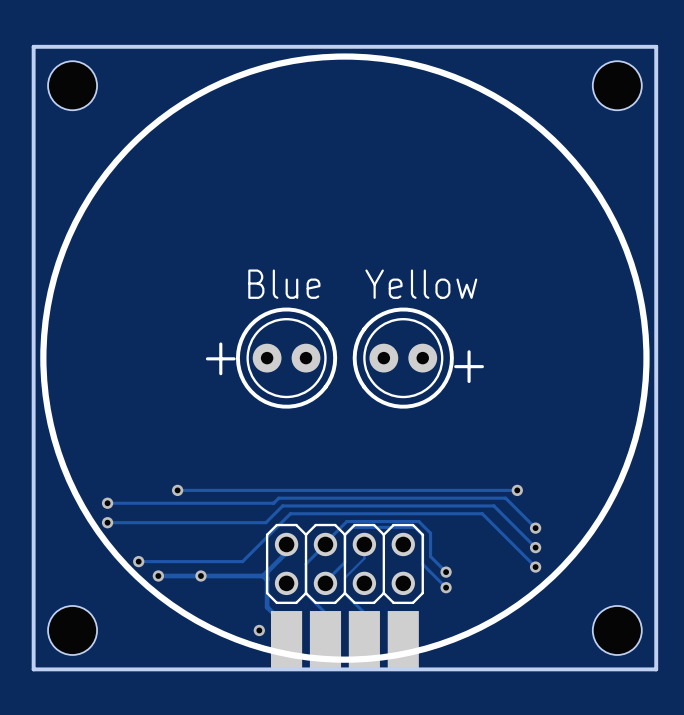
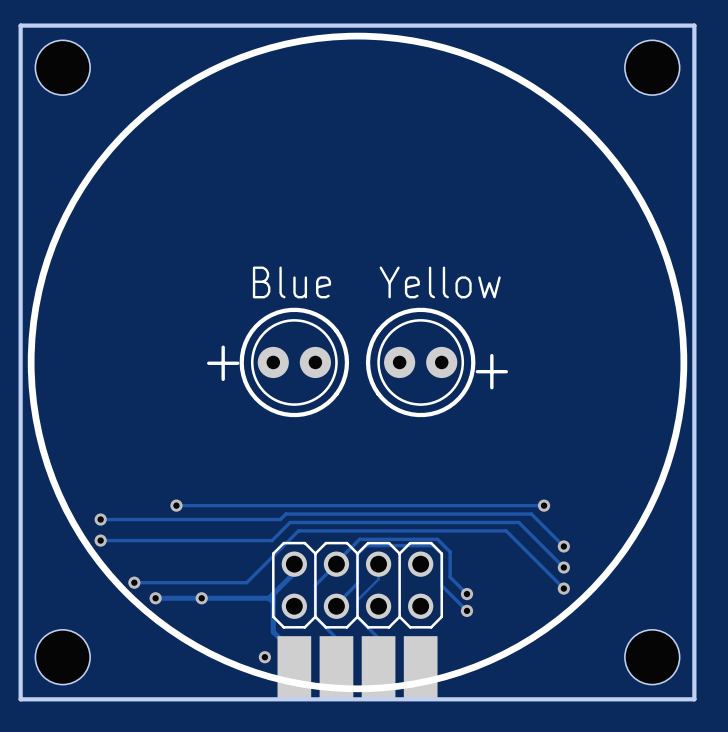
hole: (72, 85) -> none
part: none -> (62, 67)
hole: (617, 85) -> none
part: none -> (652, 67)
hole: (72, 630) -> none
part: none -> (62, 657)
hole: (617, 630) -> none
part: none -> (652, 657)

